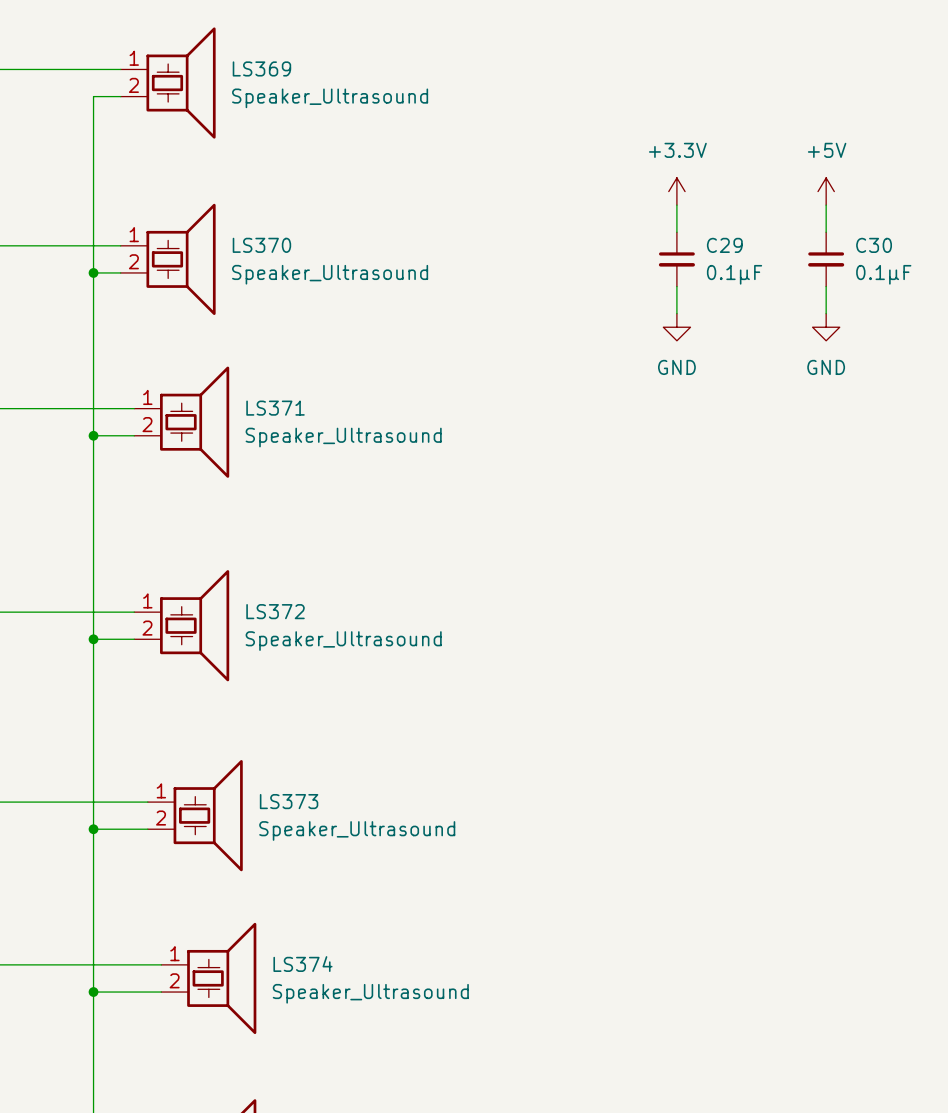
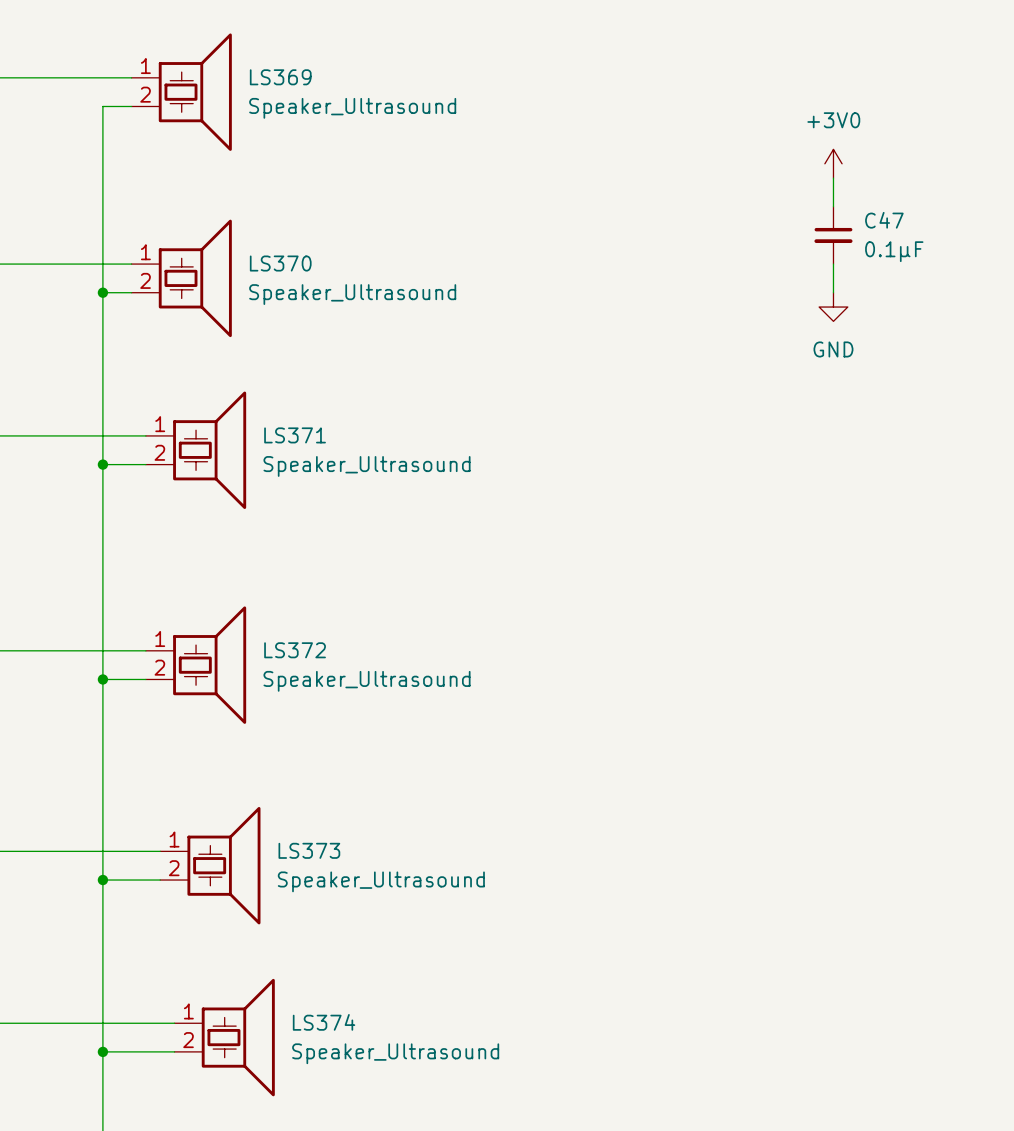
power symbol: none -> +3V0 (833, 163)
power symbol: +3.3V (676, 191) -> none
power symbol: +5V (826, 191) -> none
wire: (676, 205) (676, 232) -> (833, 178) (833, 206)
wire: (826, 205) (826, 232) -> (833, 264) (833, 292)
C47: none -> 0.1μF (833, 235)
C29: 0.1μF (676, 259) -> none
C30: 0.1μF (826, 259) -> none
wire: (676, 286) (676, 313) -> none
wire: (826, 286) (826, 313) -> none
power symbol: GND (676, 327) -> none
power symbol position: GND (826, 327) -> GND (833, 307)

